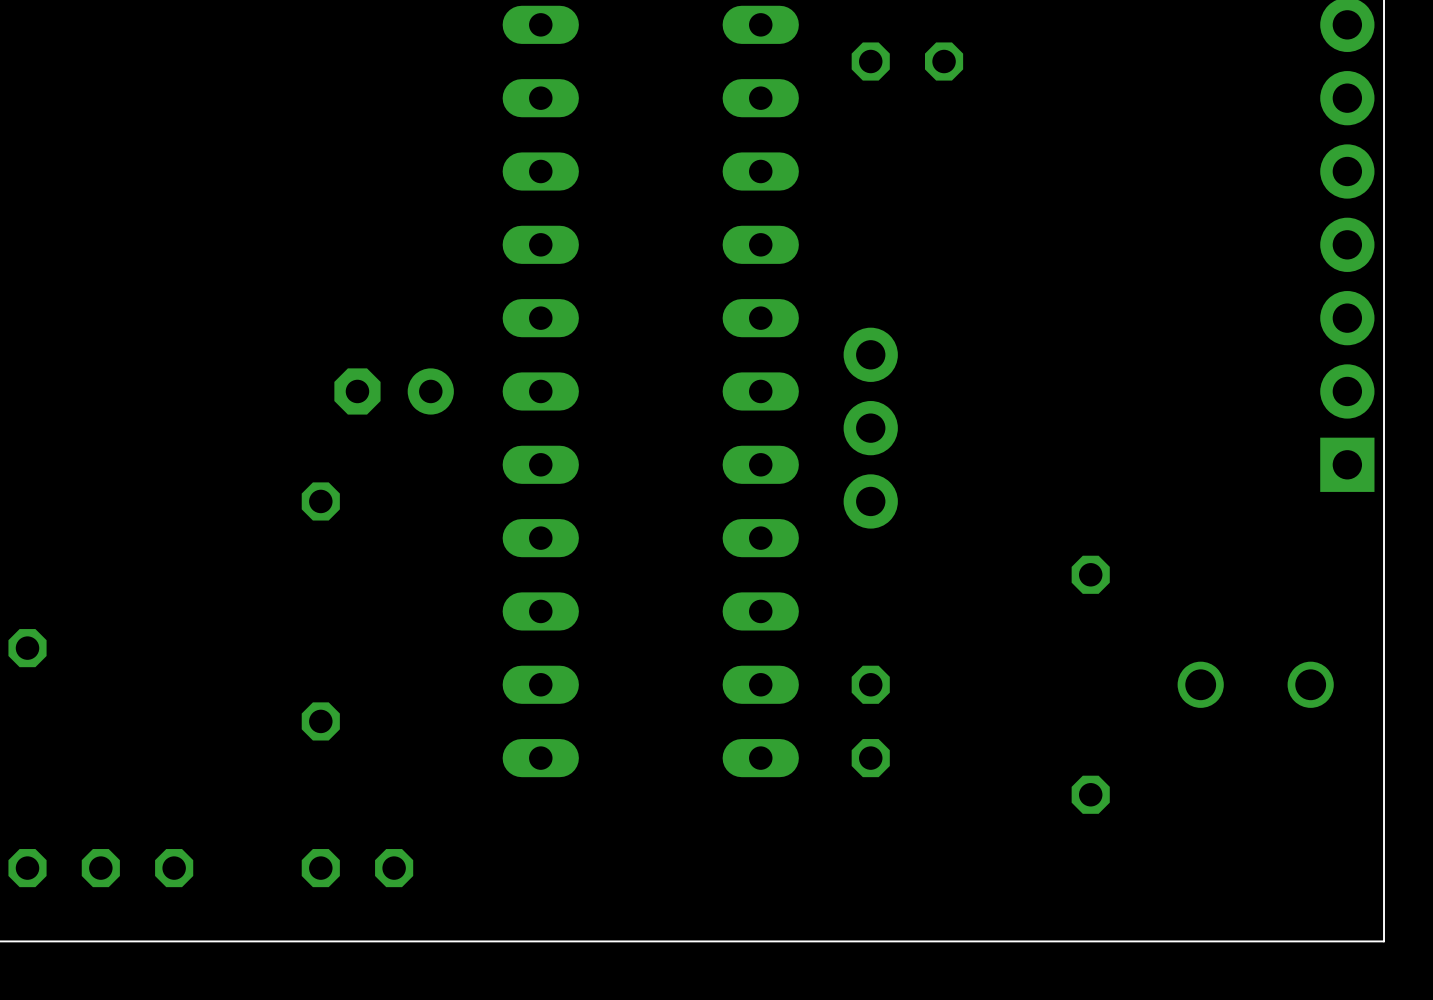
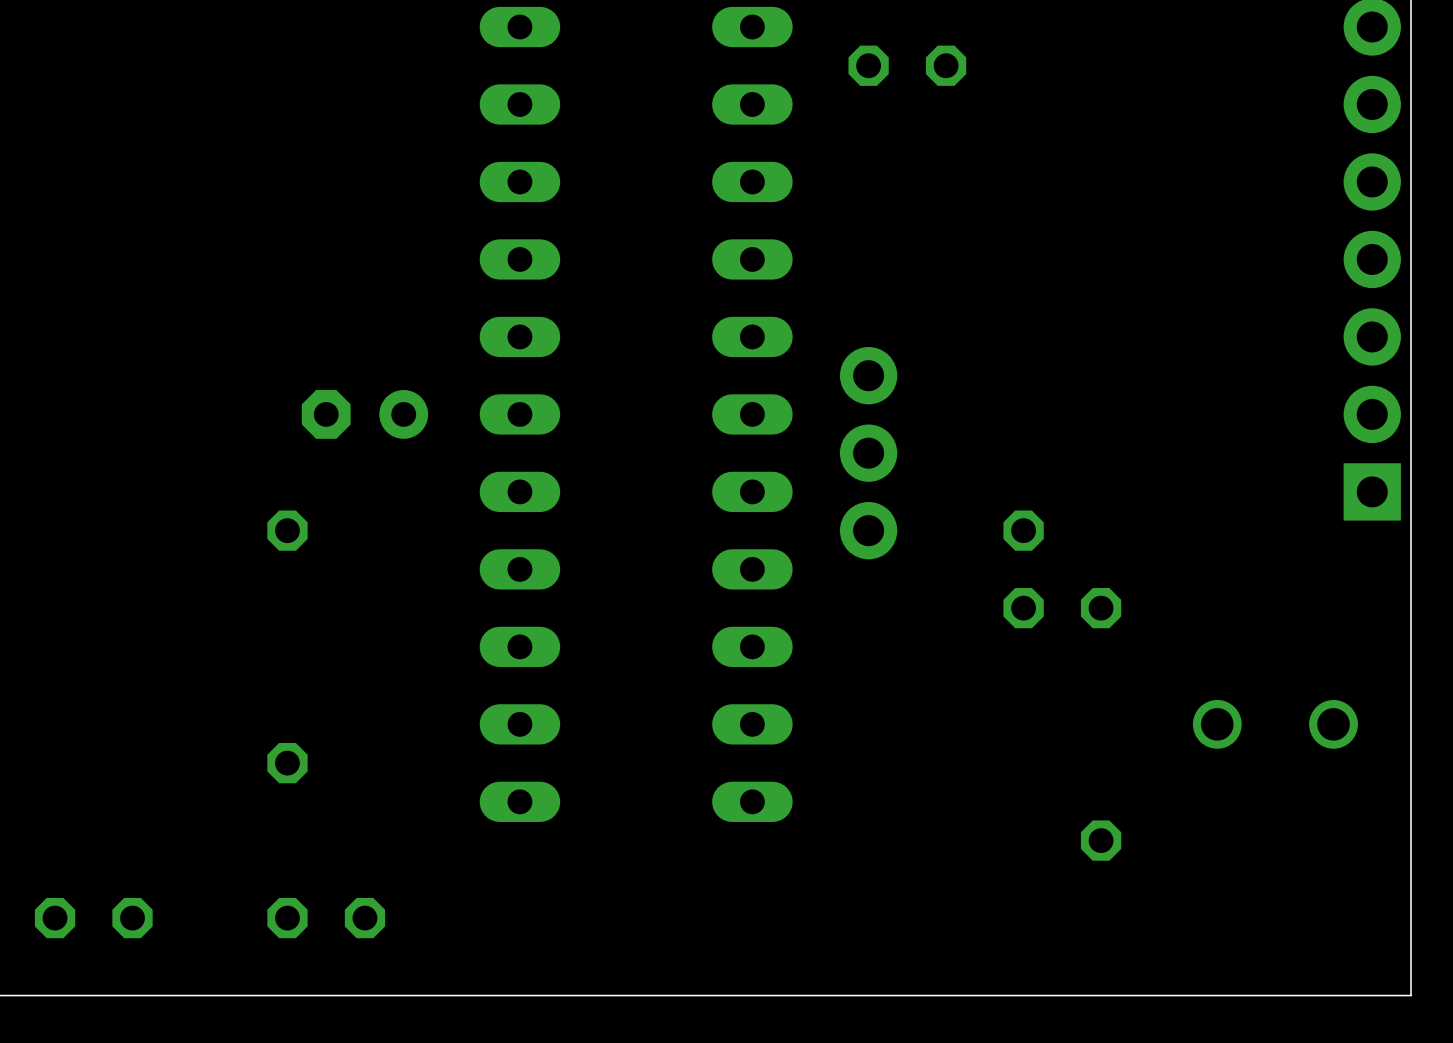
part position: (870, 721) -> (1023, 569)

